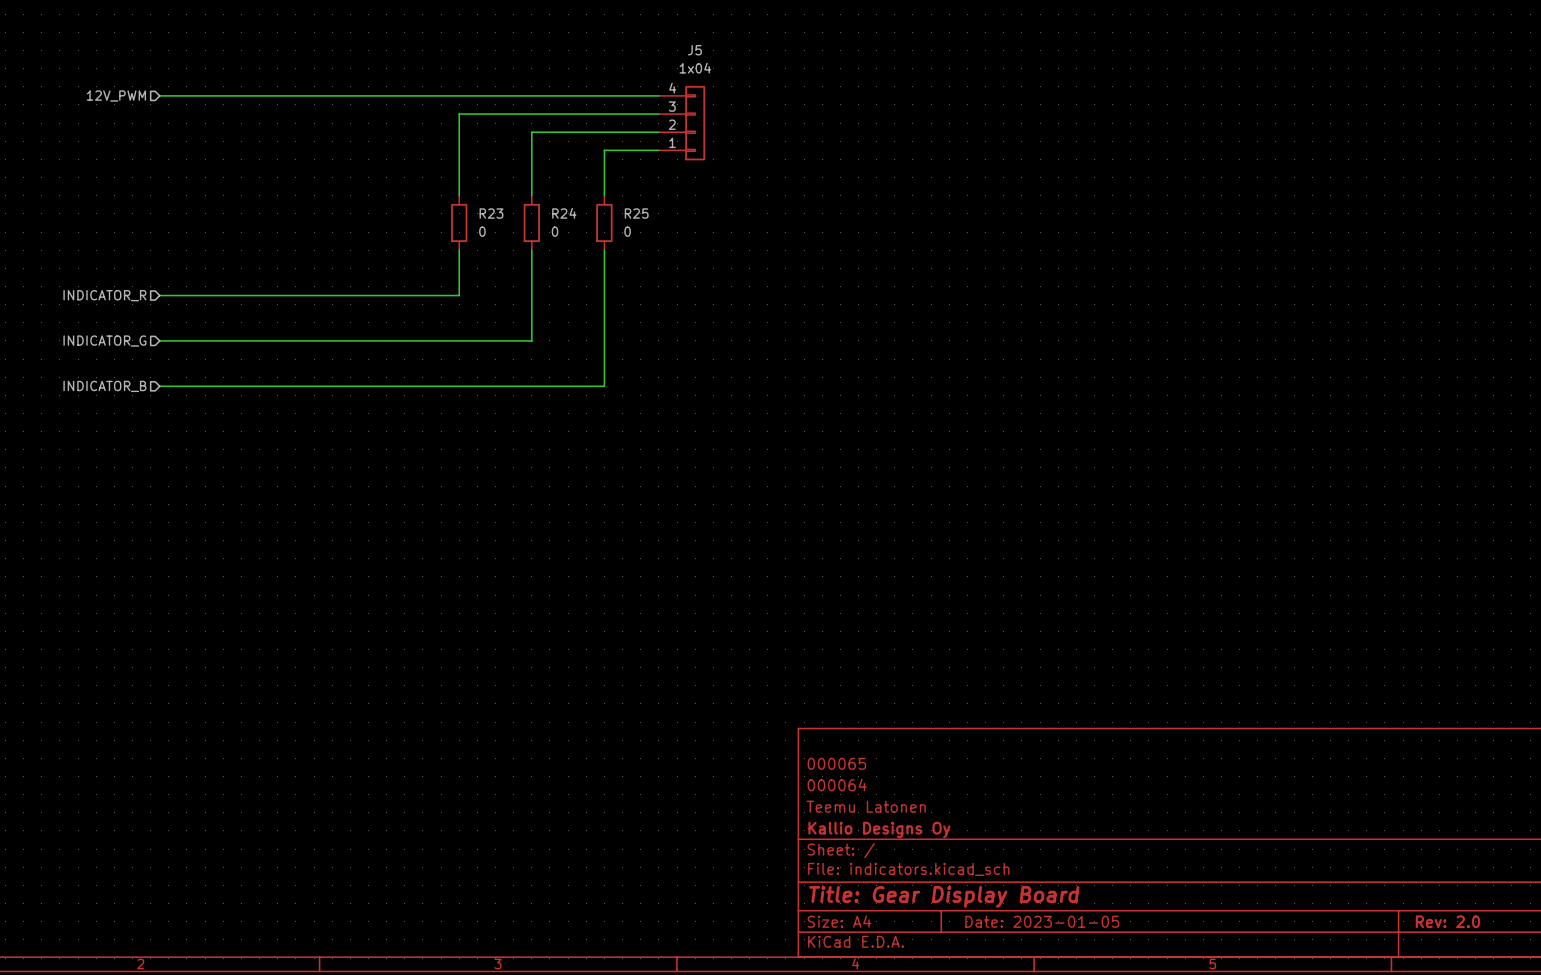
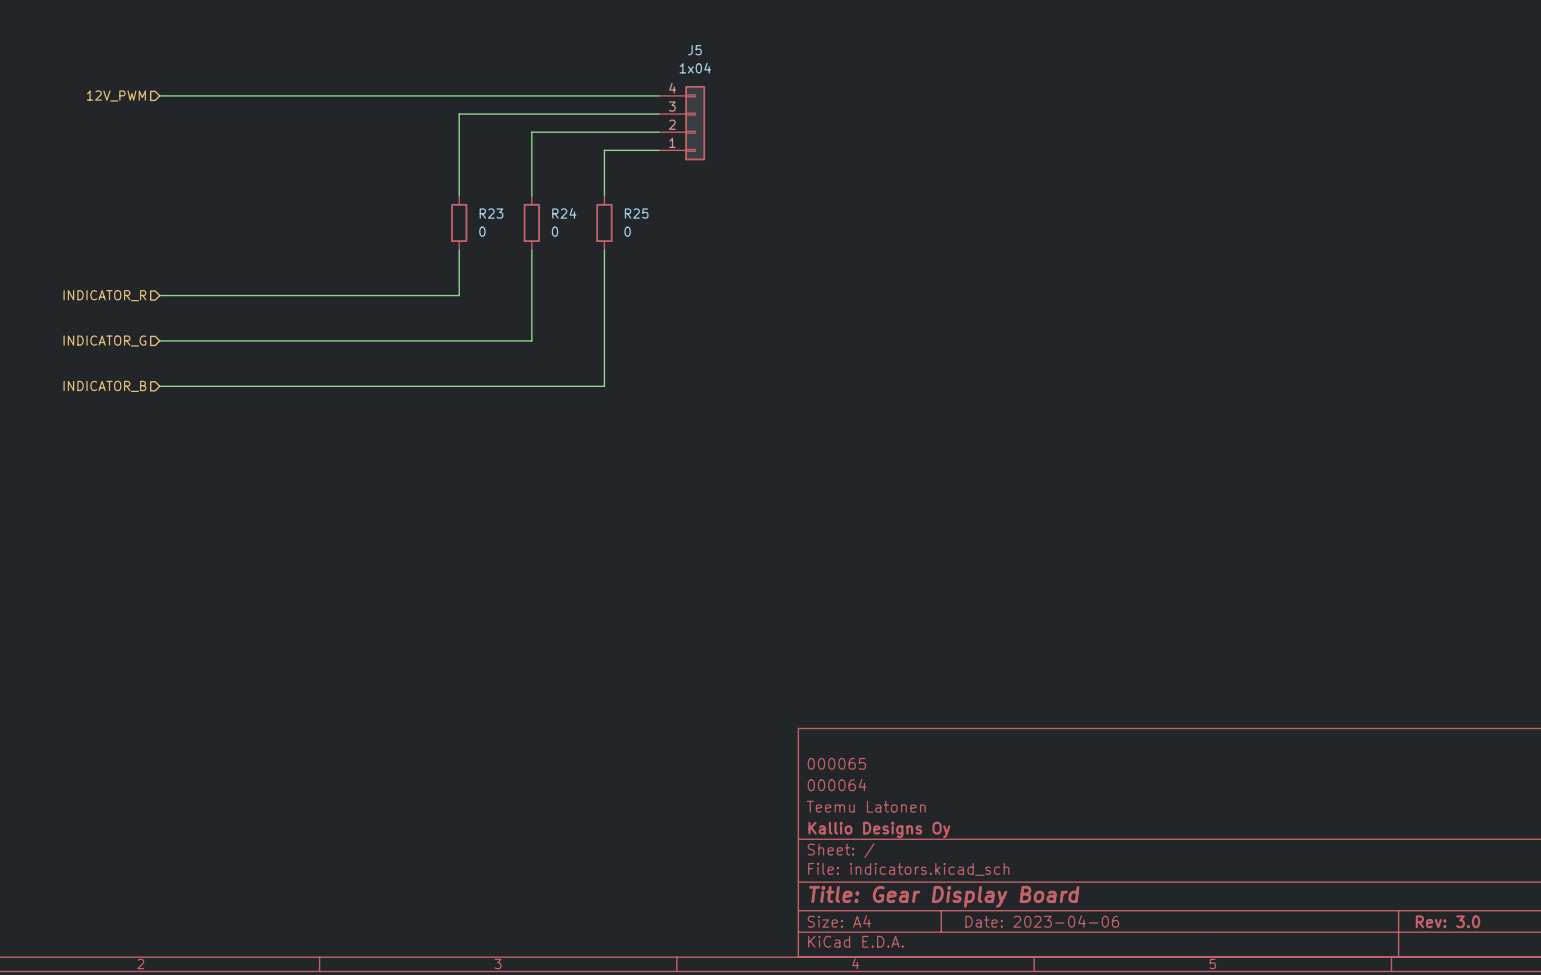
title block: Date: 2023-01-05 (1042, 921) -> Date: 2023-04-06 (1042, 921)
title block: Rev: 2.0 (1447, 921) -> Rev: 3.0 (1447, 921)

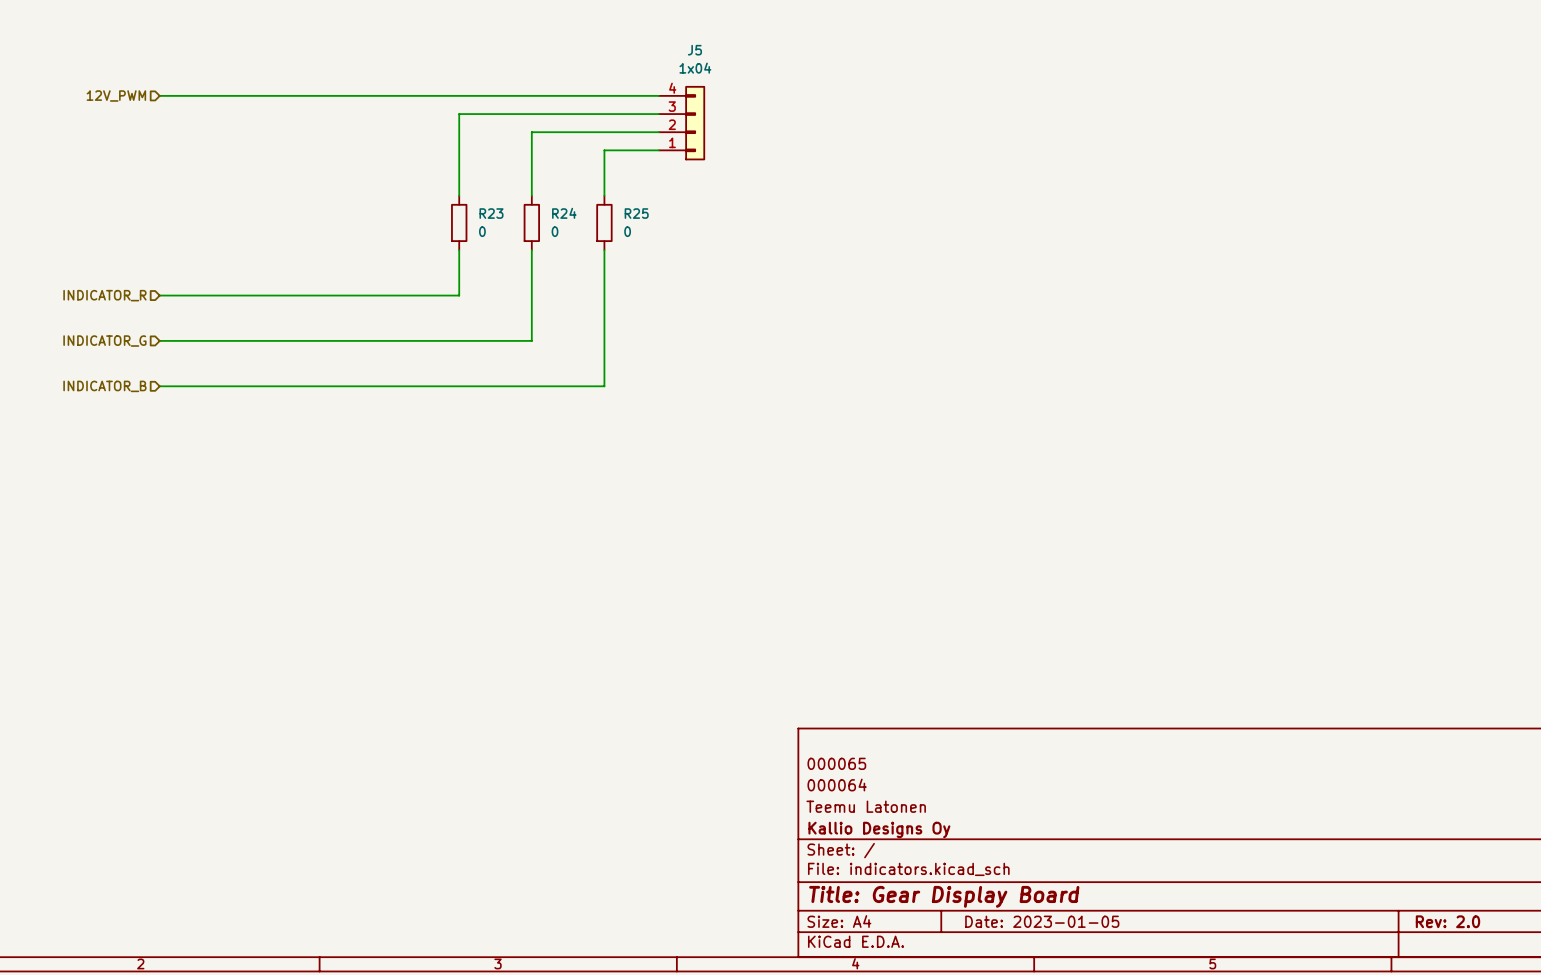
title block: Date: 2023-04-06 (1042, 921) -> Date: 2023-01-05 (1042, 921)
title block: Rev: 3.0 (1447, 921) -> Rev: 2.0 (1447, 921)

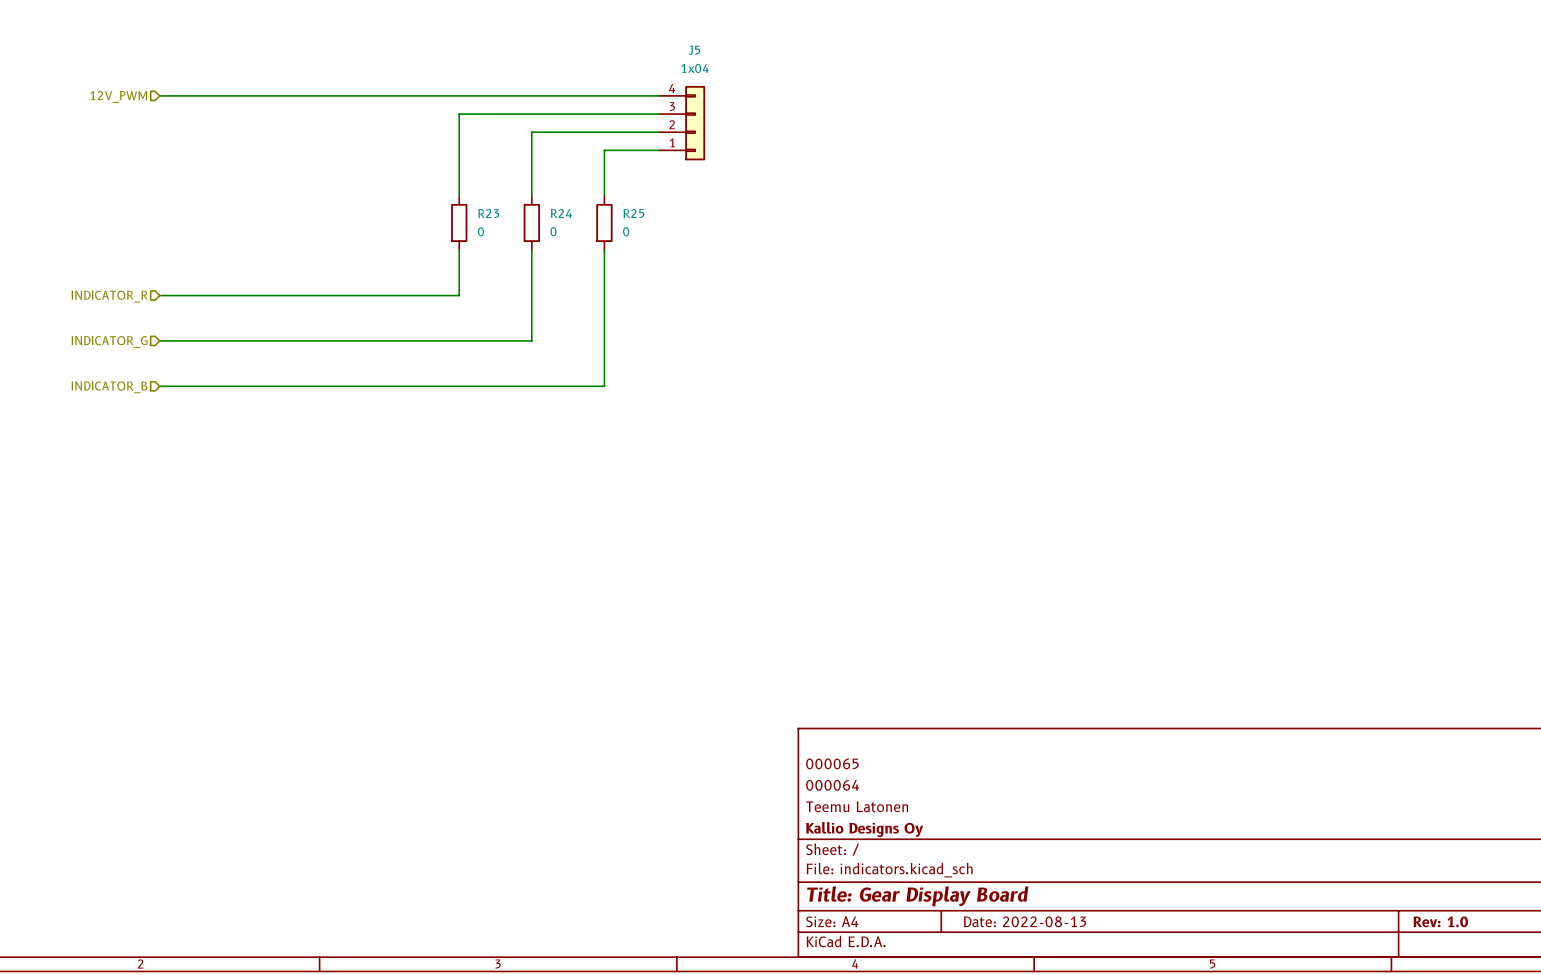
title block: Date: 2023-01-05 (1042, 921) -> Date: 2022-08-13 (1025, 921)
title block: Rev: 2.0 (1447, 921) -> Rev: 1.0 (1440, 921)

